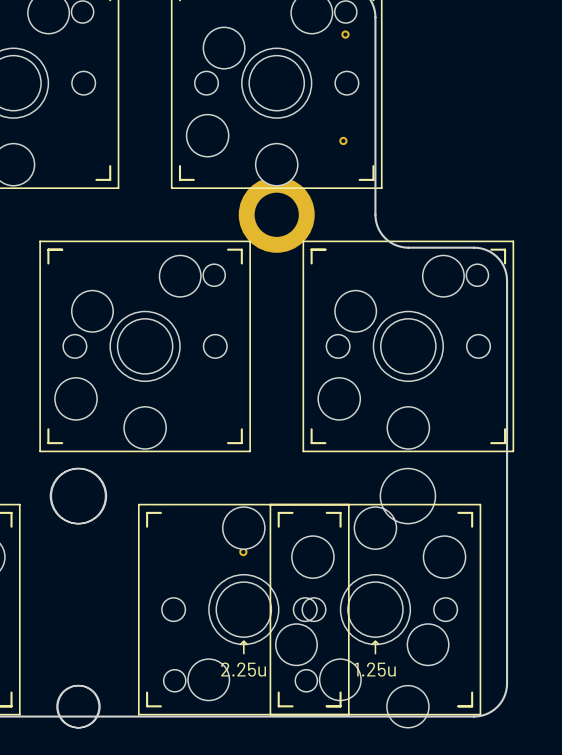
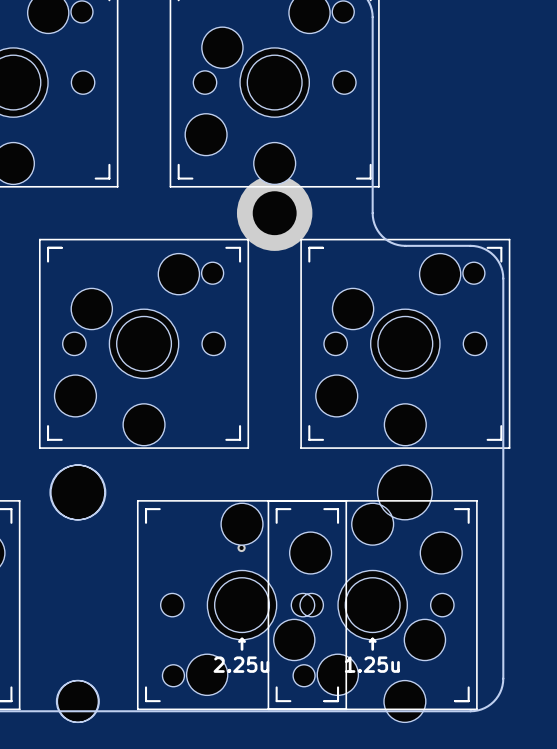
part: (345, 34) -> none
part: (343, 140) -> none

